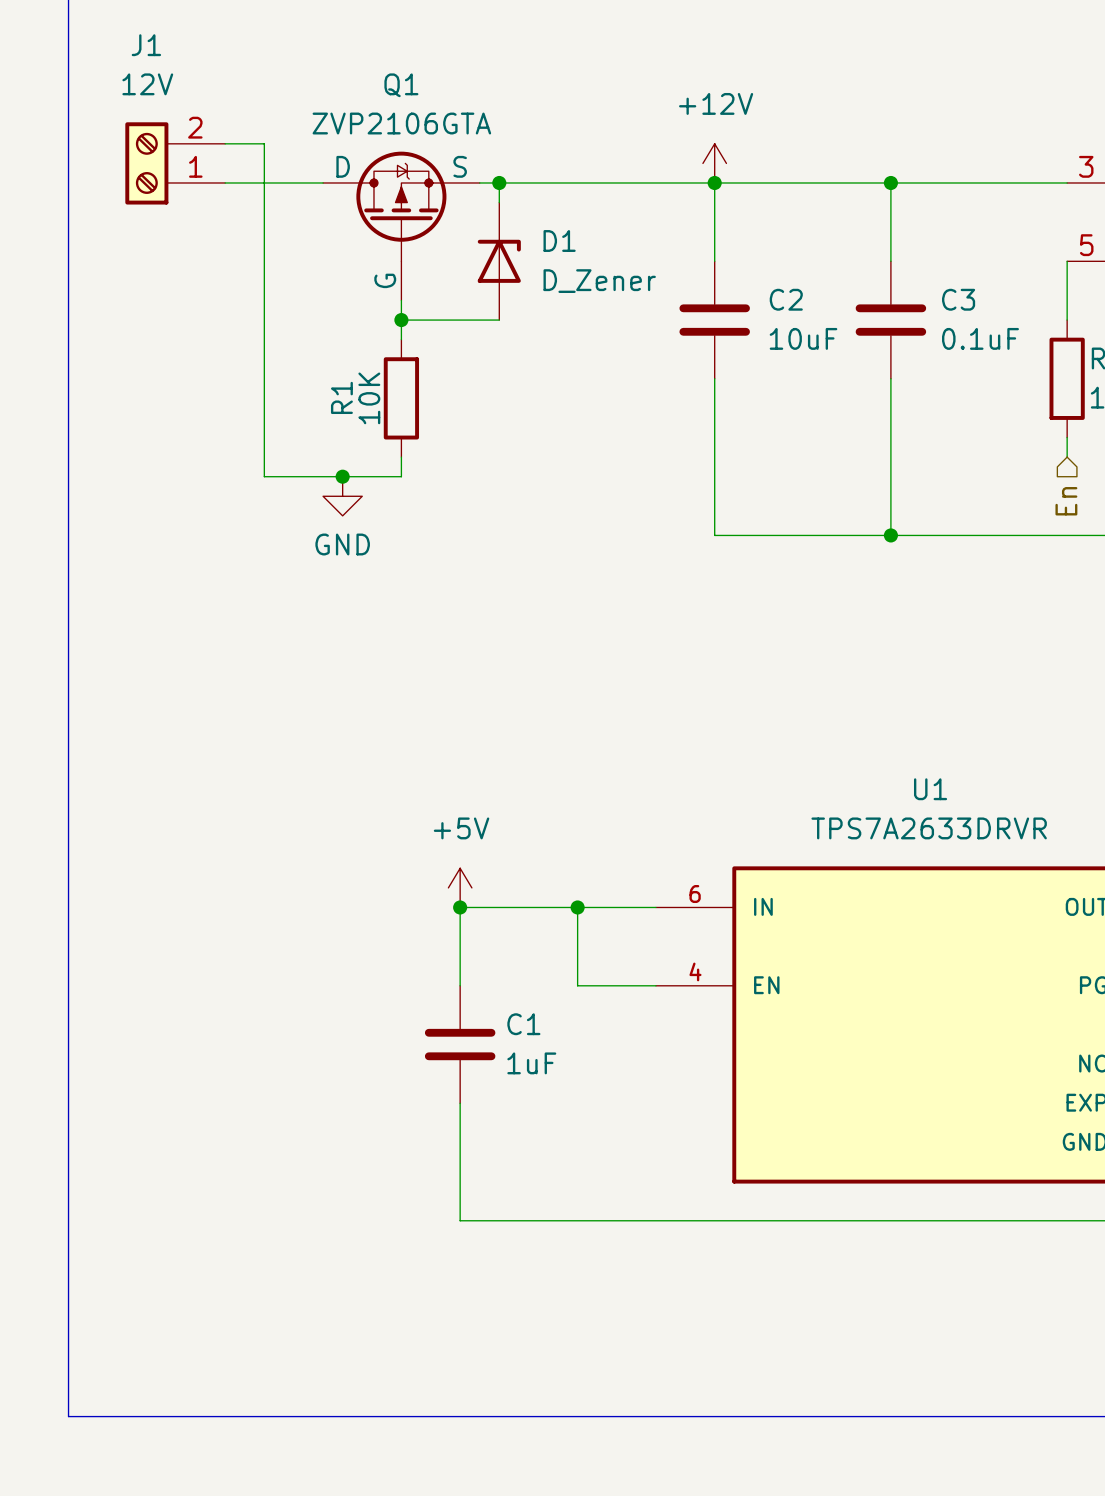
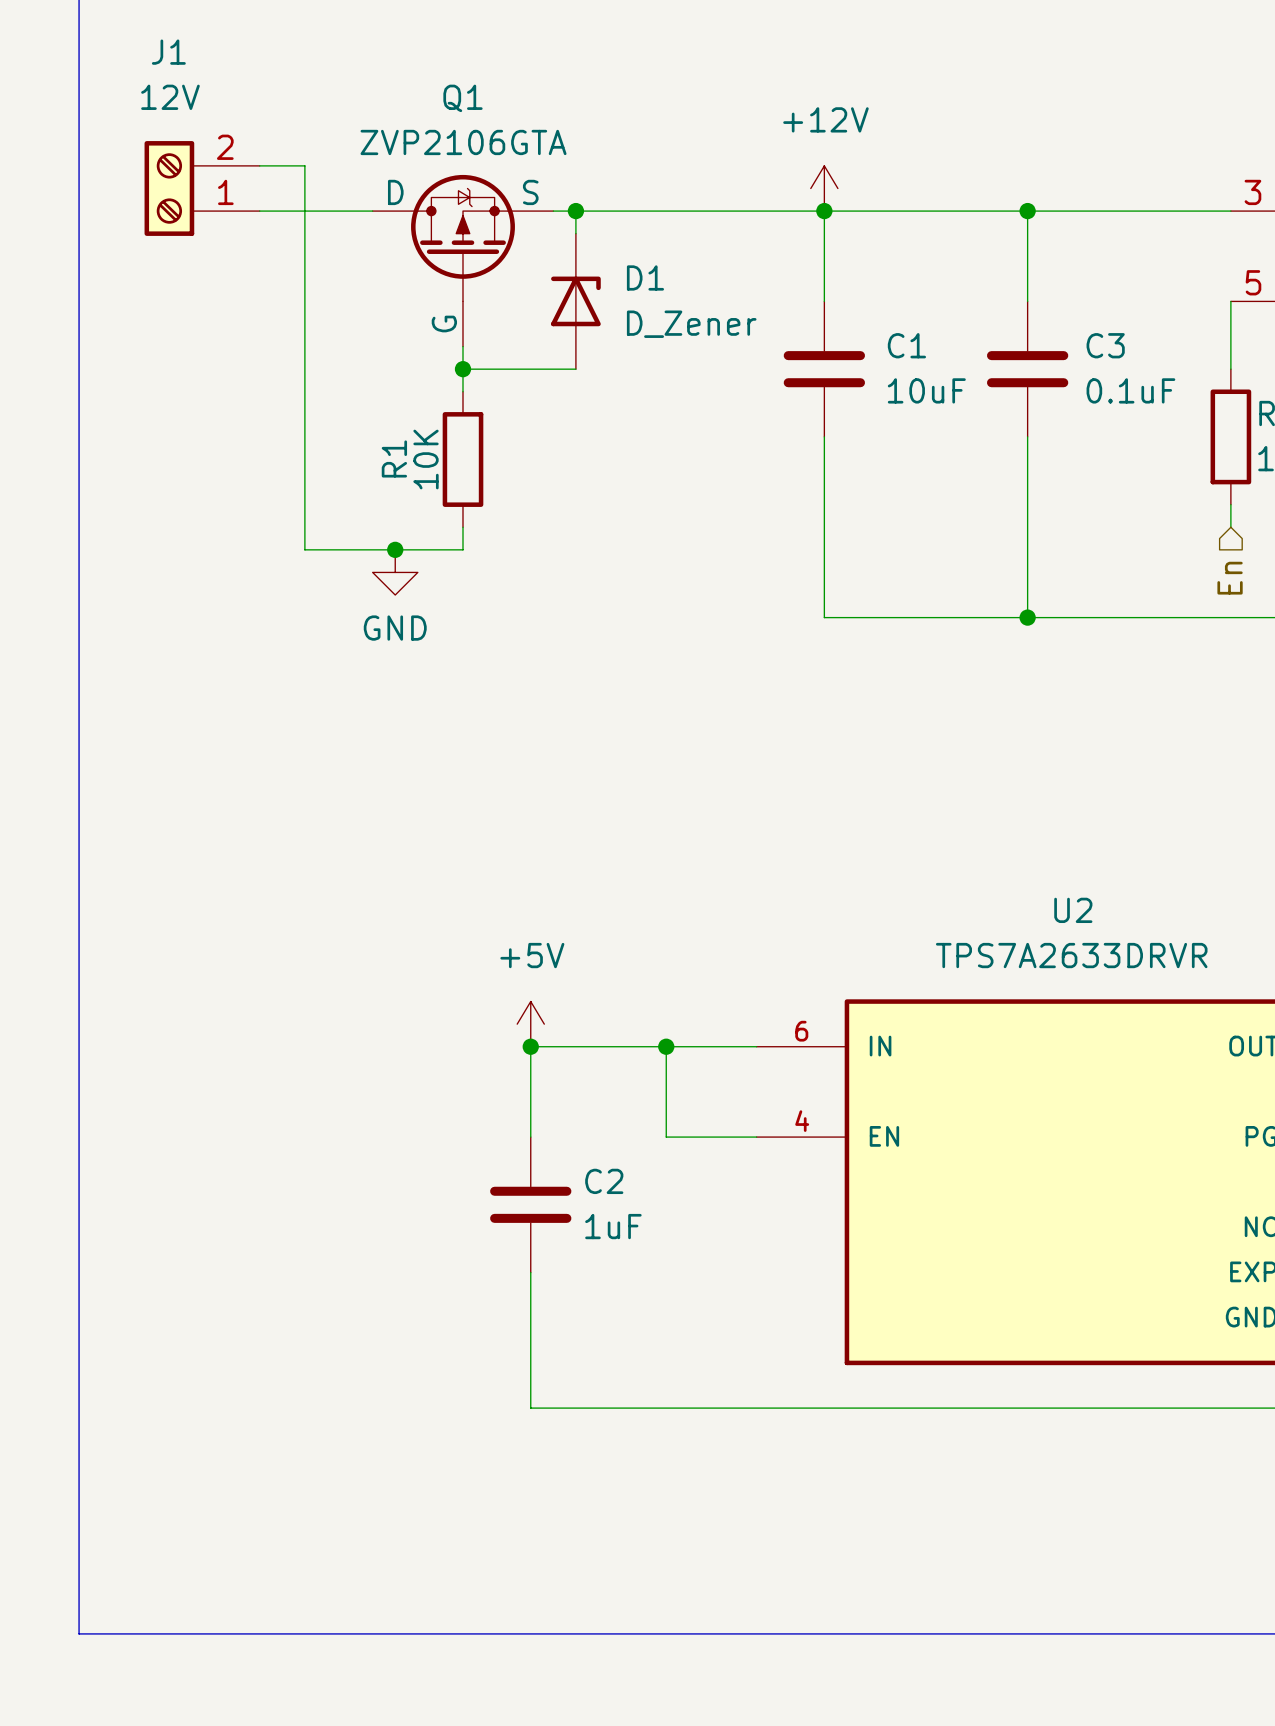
C2 name: C2 (786, 299) -> C1 (906, 345)
U1 name: U1 (930, 789) -> U2 (1073, 910)
C1 name: C1 (523, 1024) -> C2 (604, 1181)

